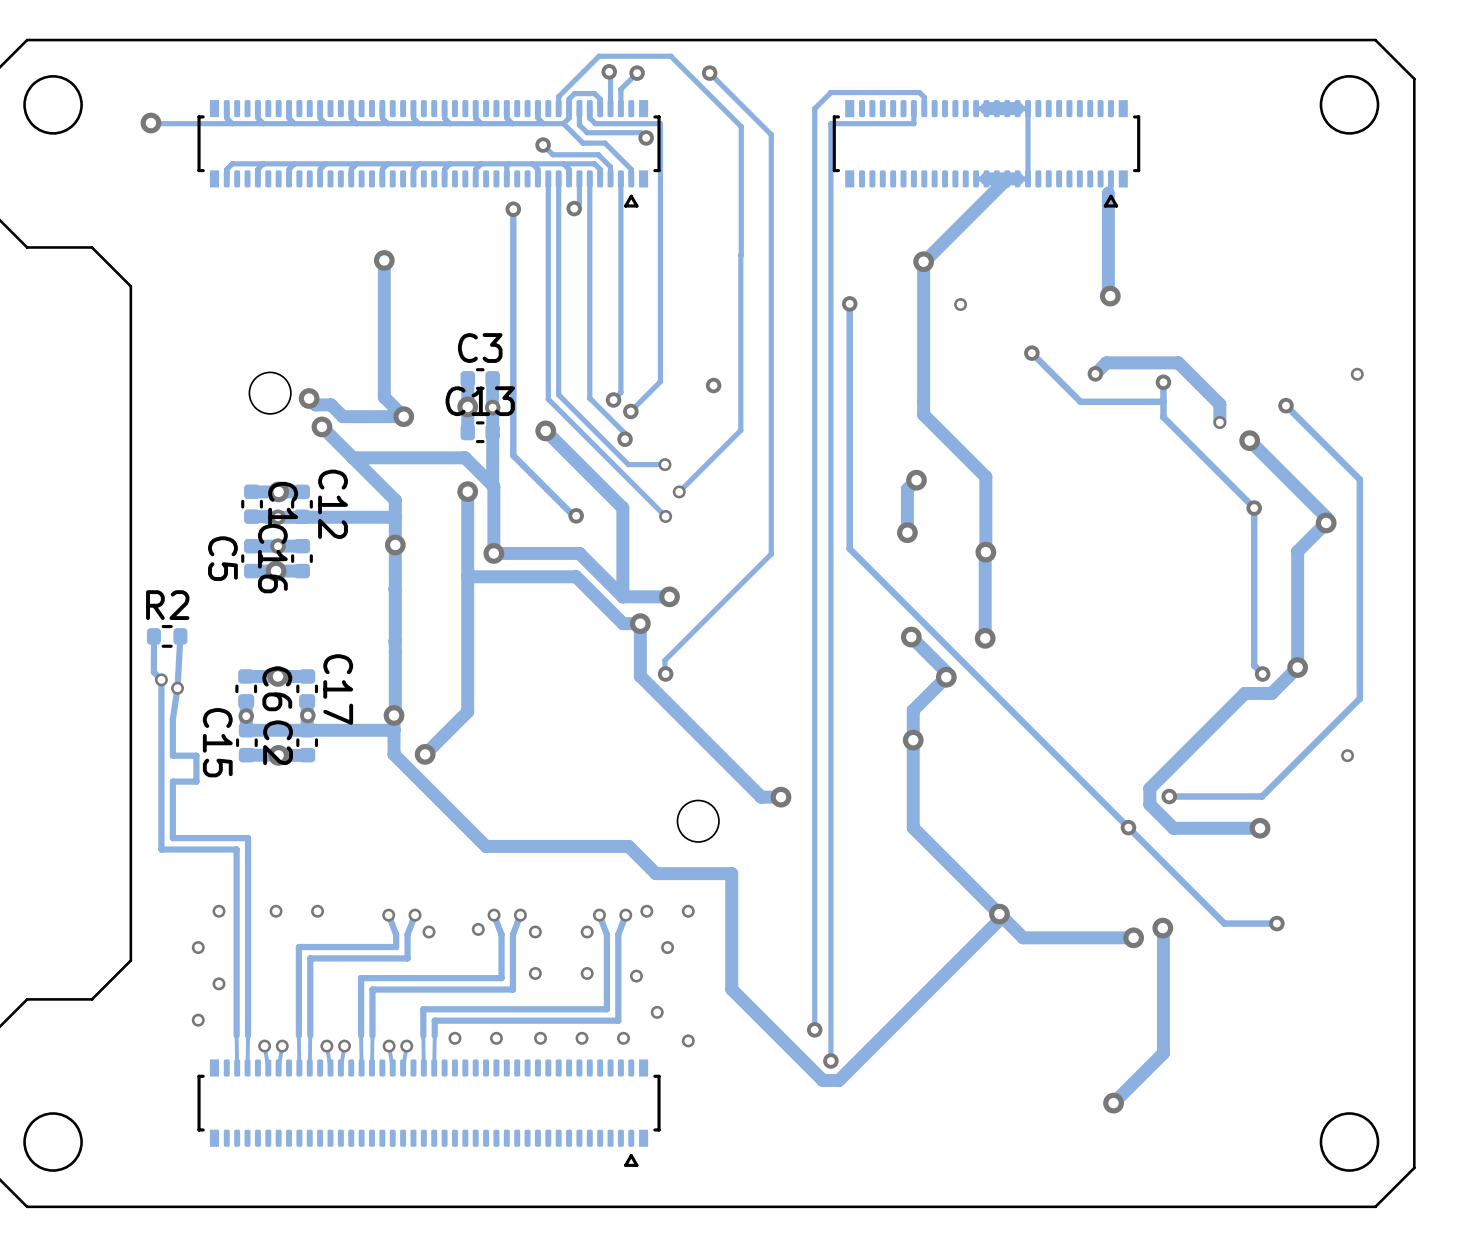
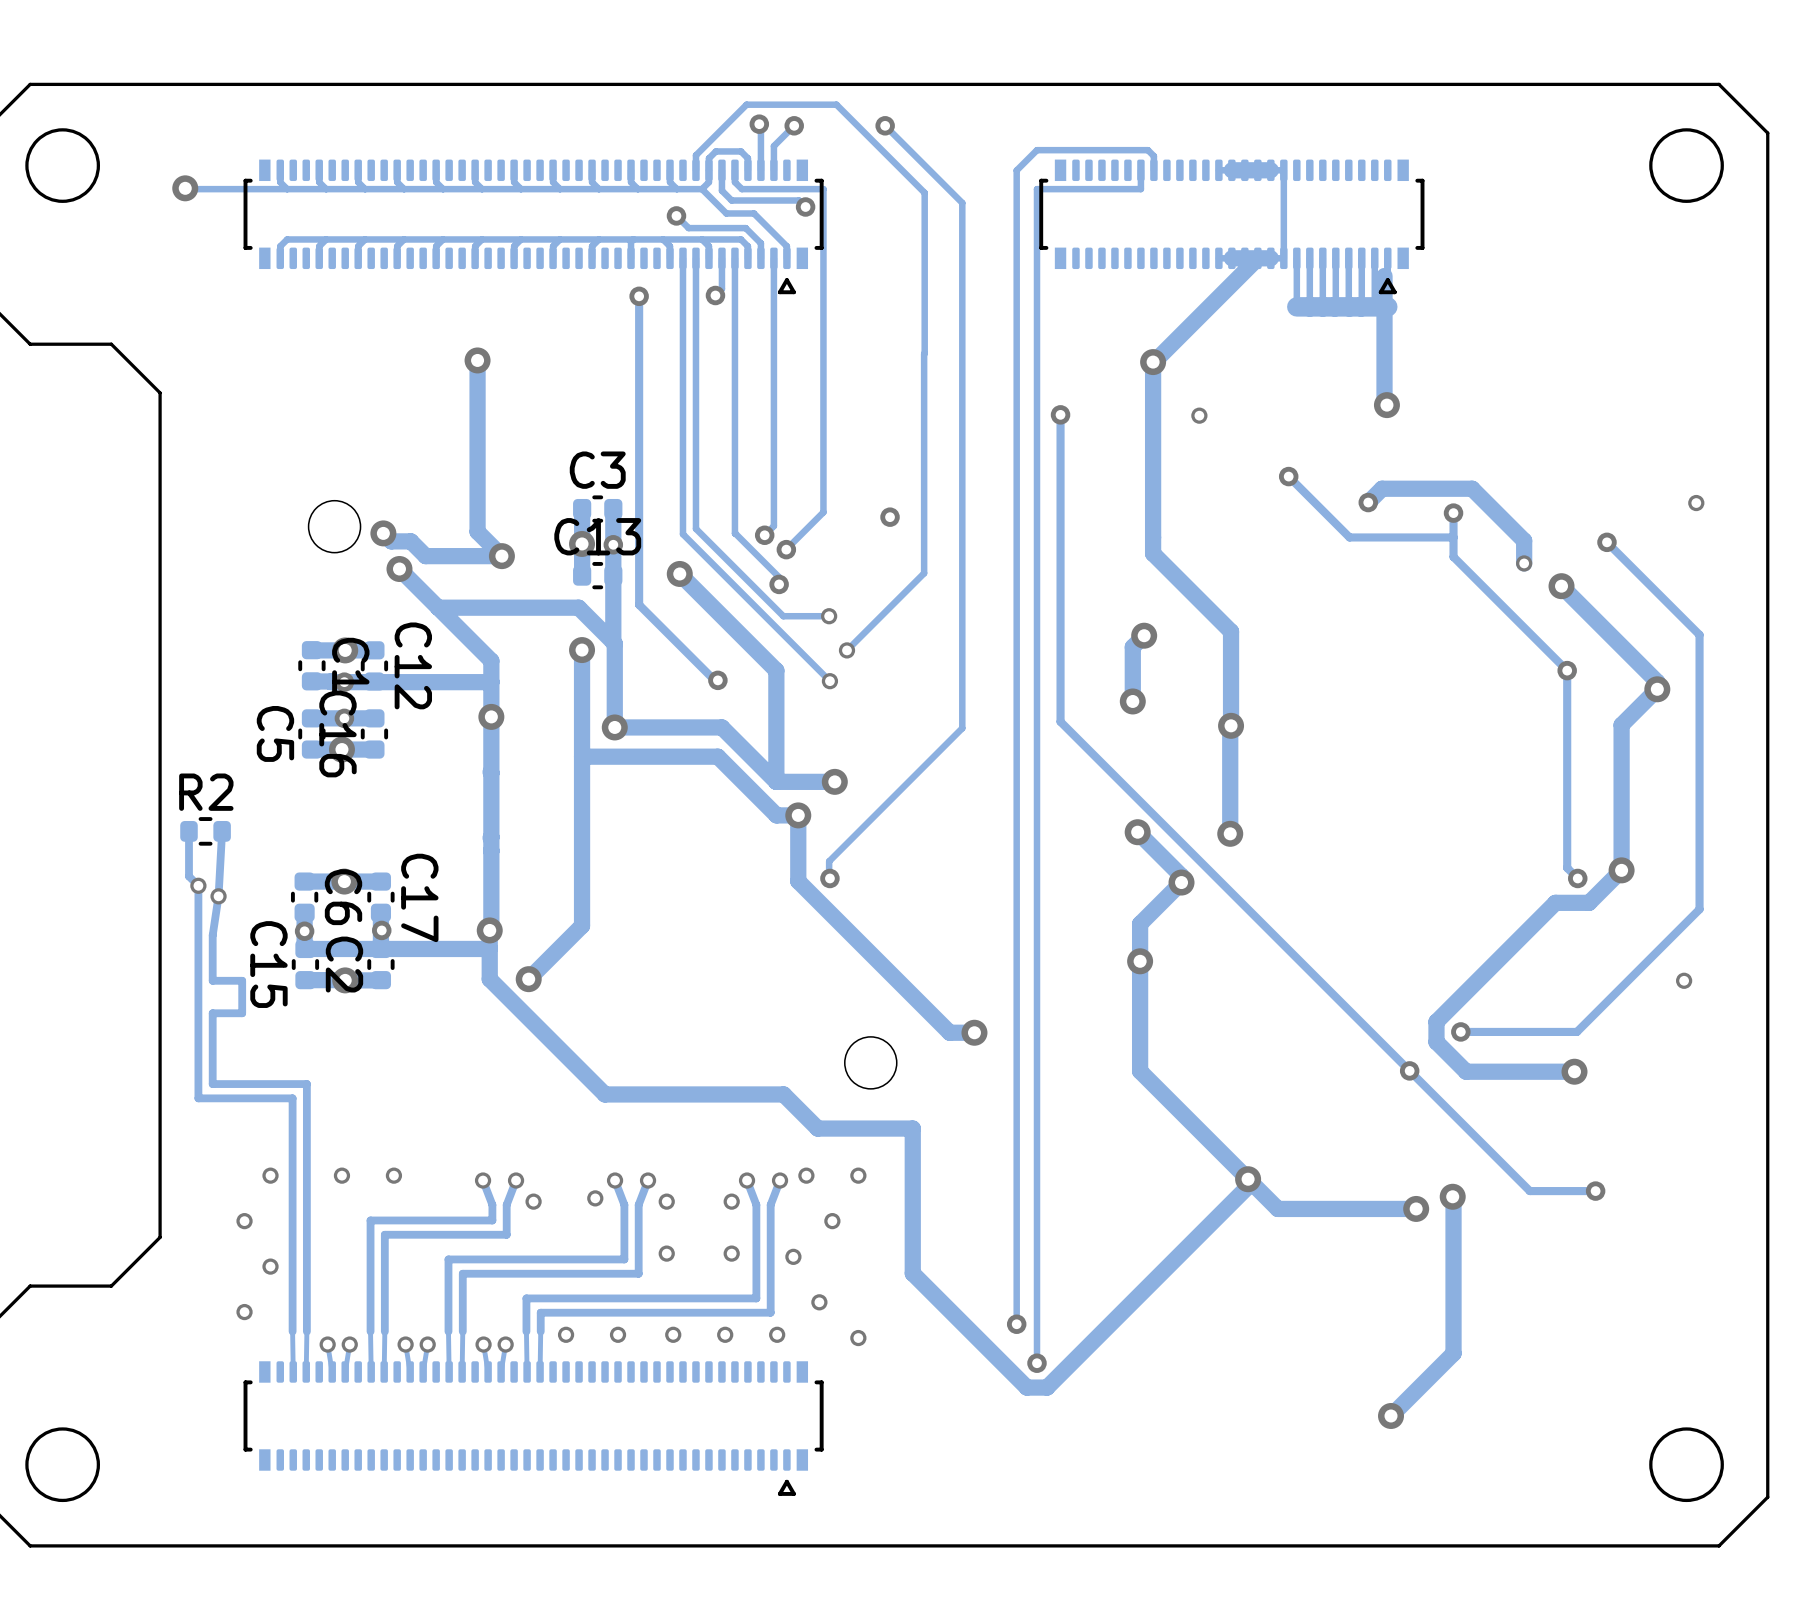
track: none -> (1296, 258) (1296, 306) (1387, 306)
track: none -> (1309, 258) (1309, 306)
track: none -> (1322, 258) (1322, 306)
track: none -> (1335, 258) (1334, 306)
track: none -> (1348, 258) (1349, 306)
track: none -> (1361, 258) (1361, 306)
track: none -> (1374, 258) (1374, 306)

